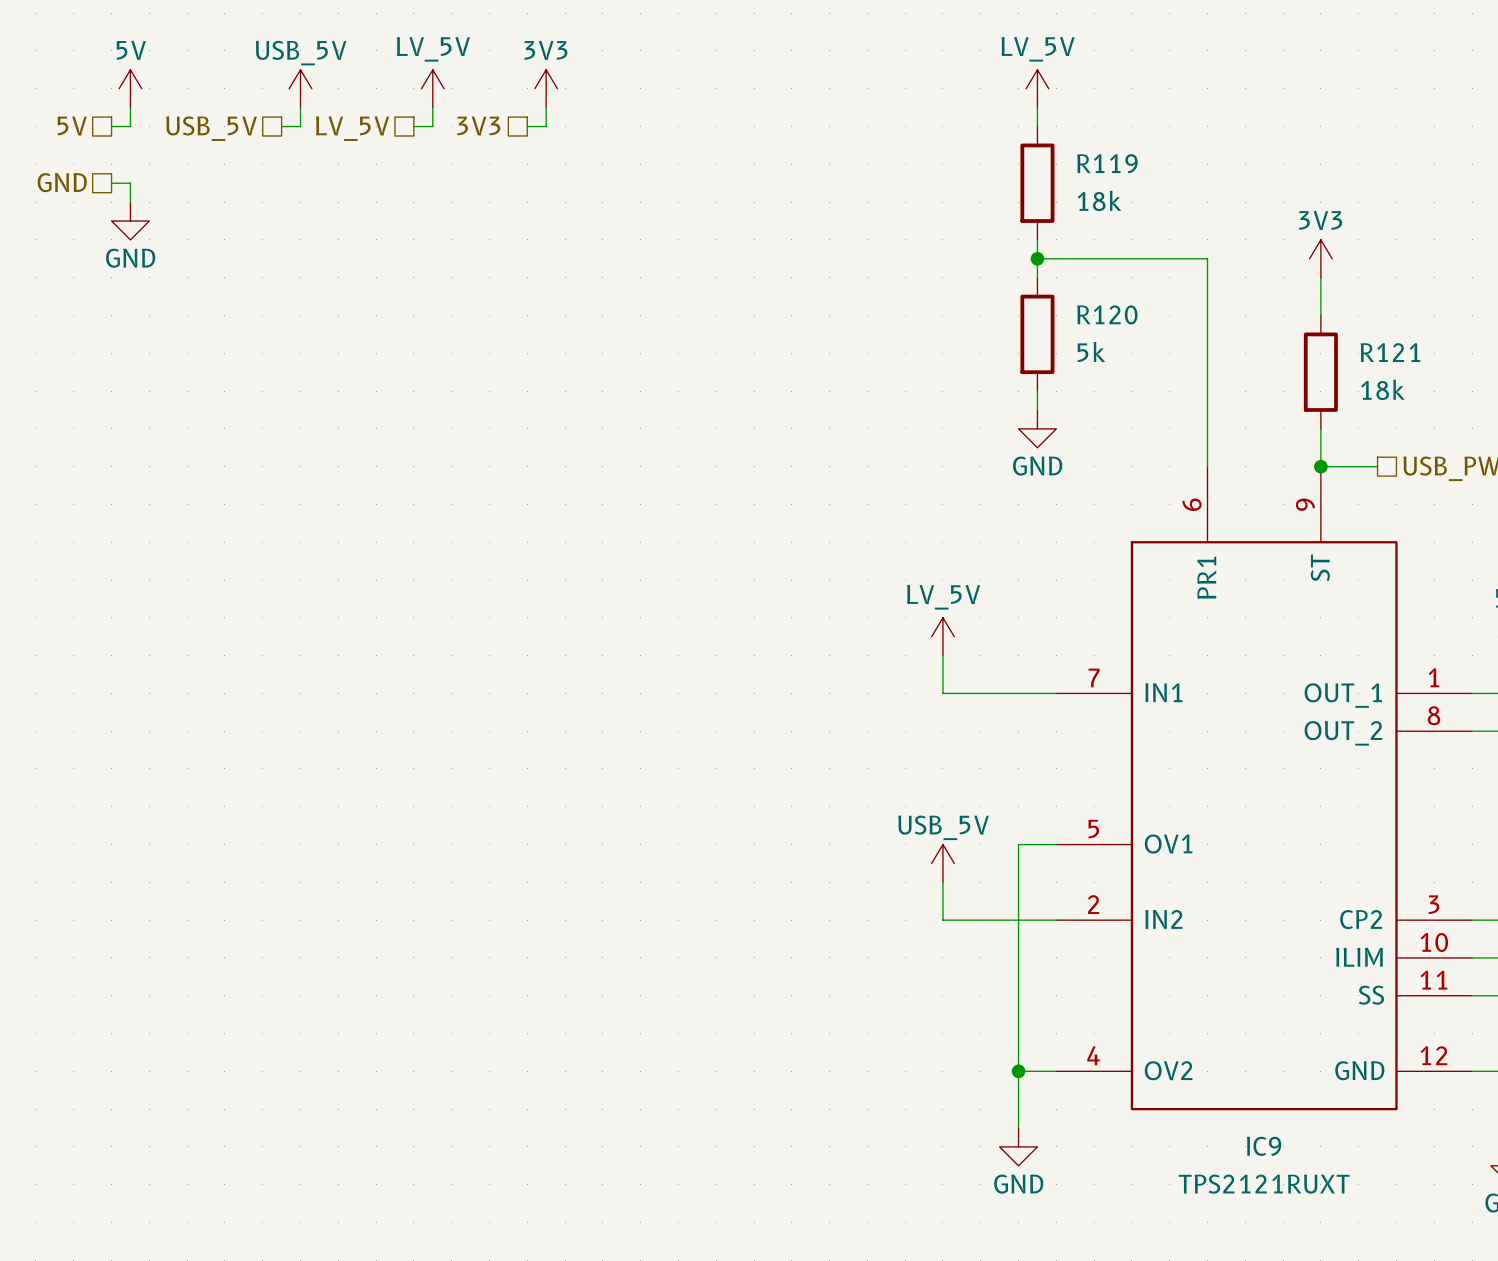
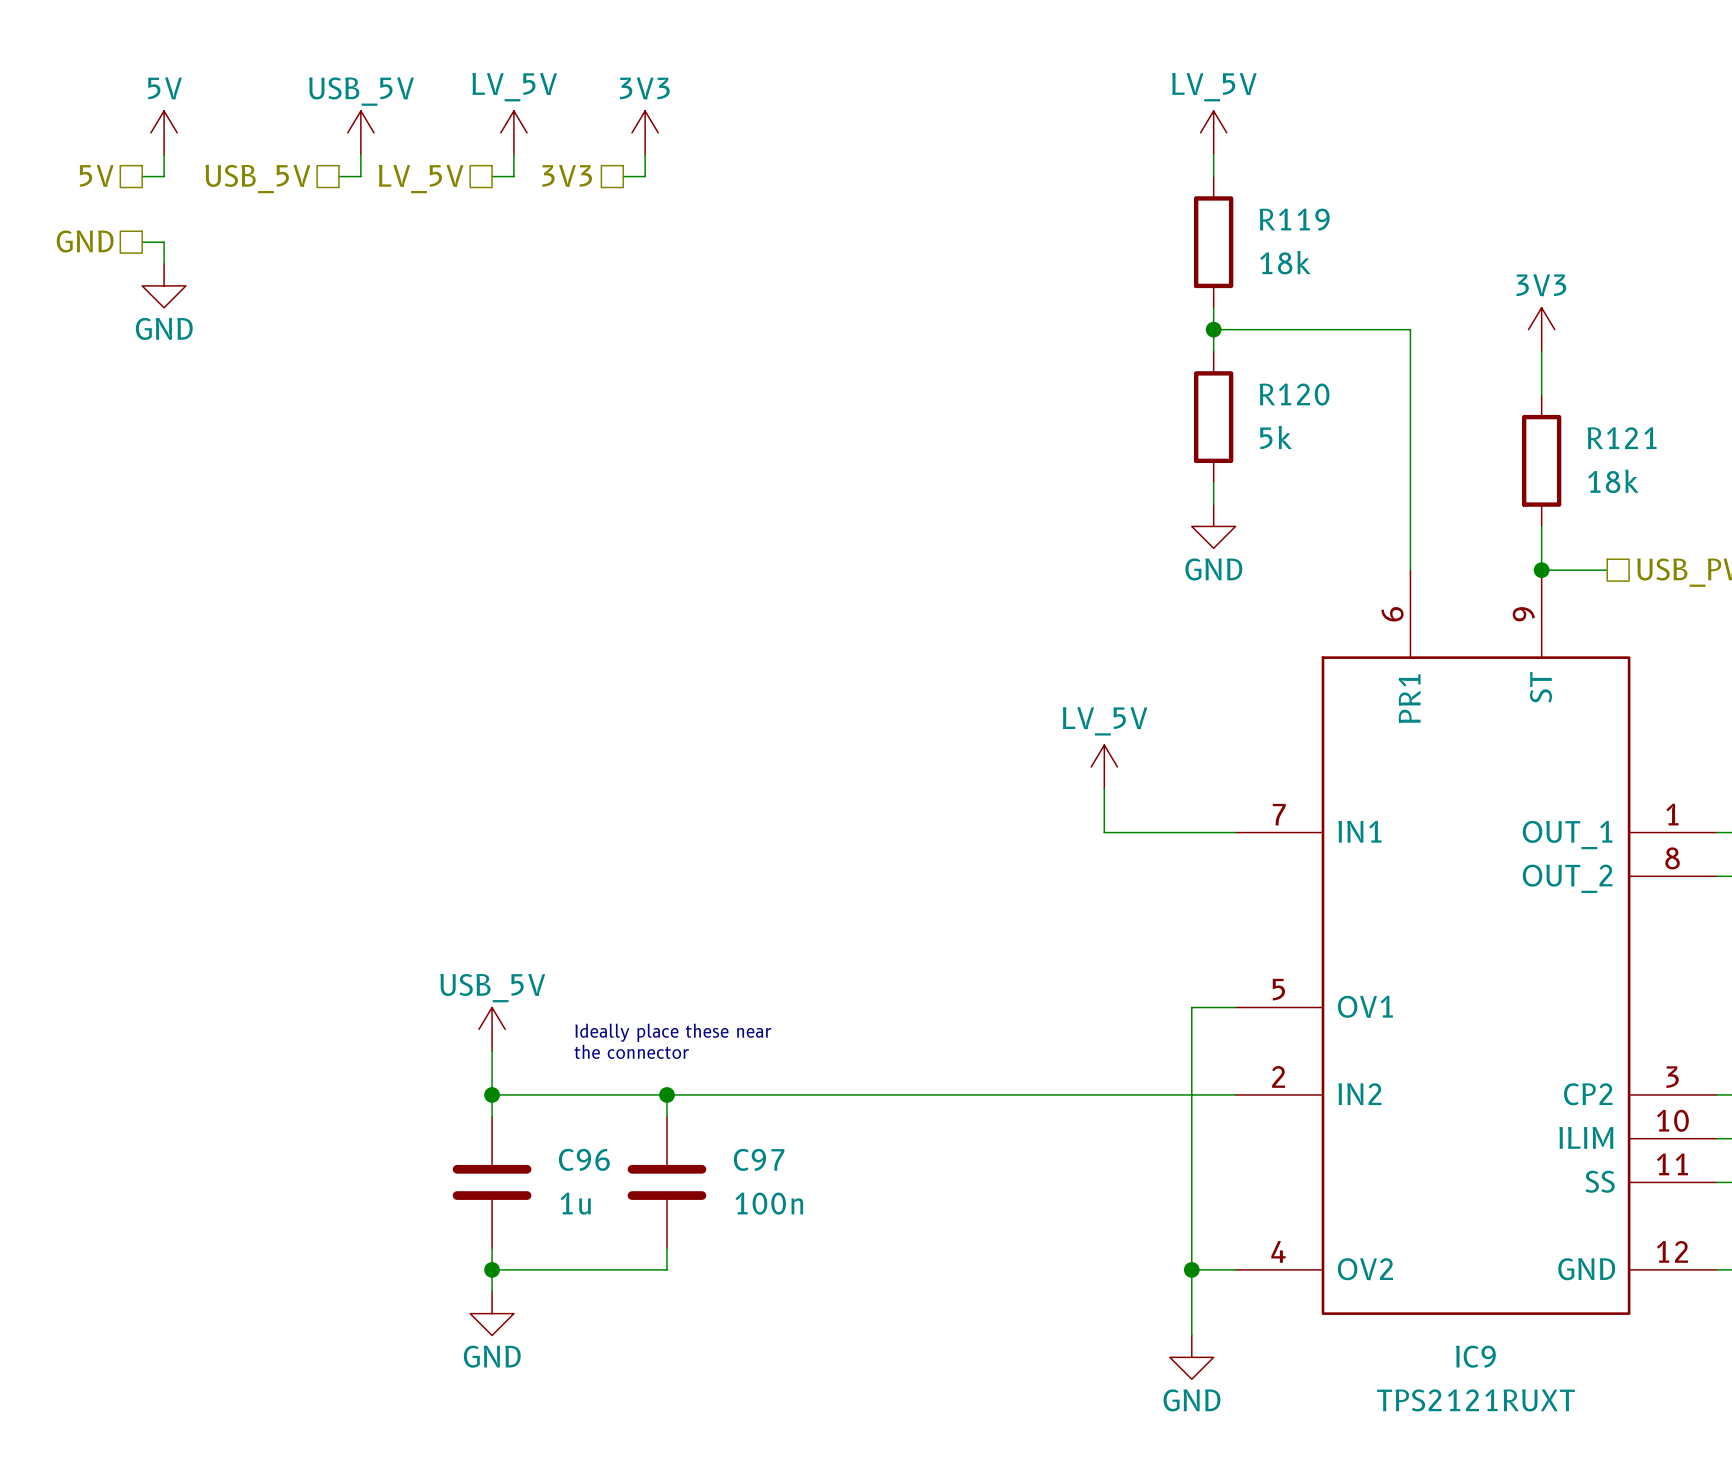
power symbol: none -> USB_5V (492, 1029)
power symbol: USB_5V (942, 863) -> none
text: none -> Ideally place these near (673, 1032)
wire: none -> (492, 1051) (492, 1116)
text: none -> the connector (631, 1051)
wire: (942, 882) (942, 920) -> (492, 1094) (1104, 1094)
junction: none -> (492, 1094)
wire: none -> (666, 1094) (666, 1116)
junction: none -> (666, 1094)
C96: none -> 1u (492, 1182)
C97: none -> 100n (666, 1182)
wire: none -> (492, 1248) (492, 1291)
wire: none -> (666, 1248) (666, 1269) (492, 1269)
junction: none -> (492, 1269)
power symbol: none -> GND (492, 1313)

